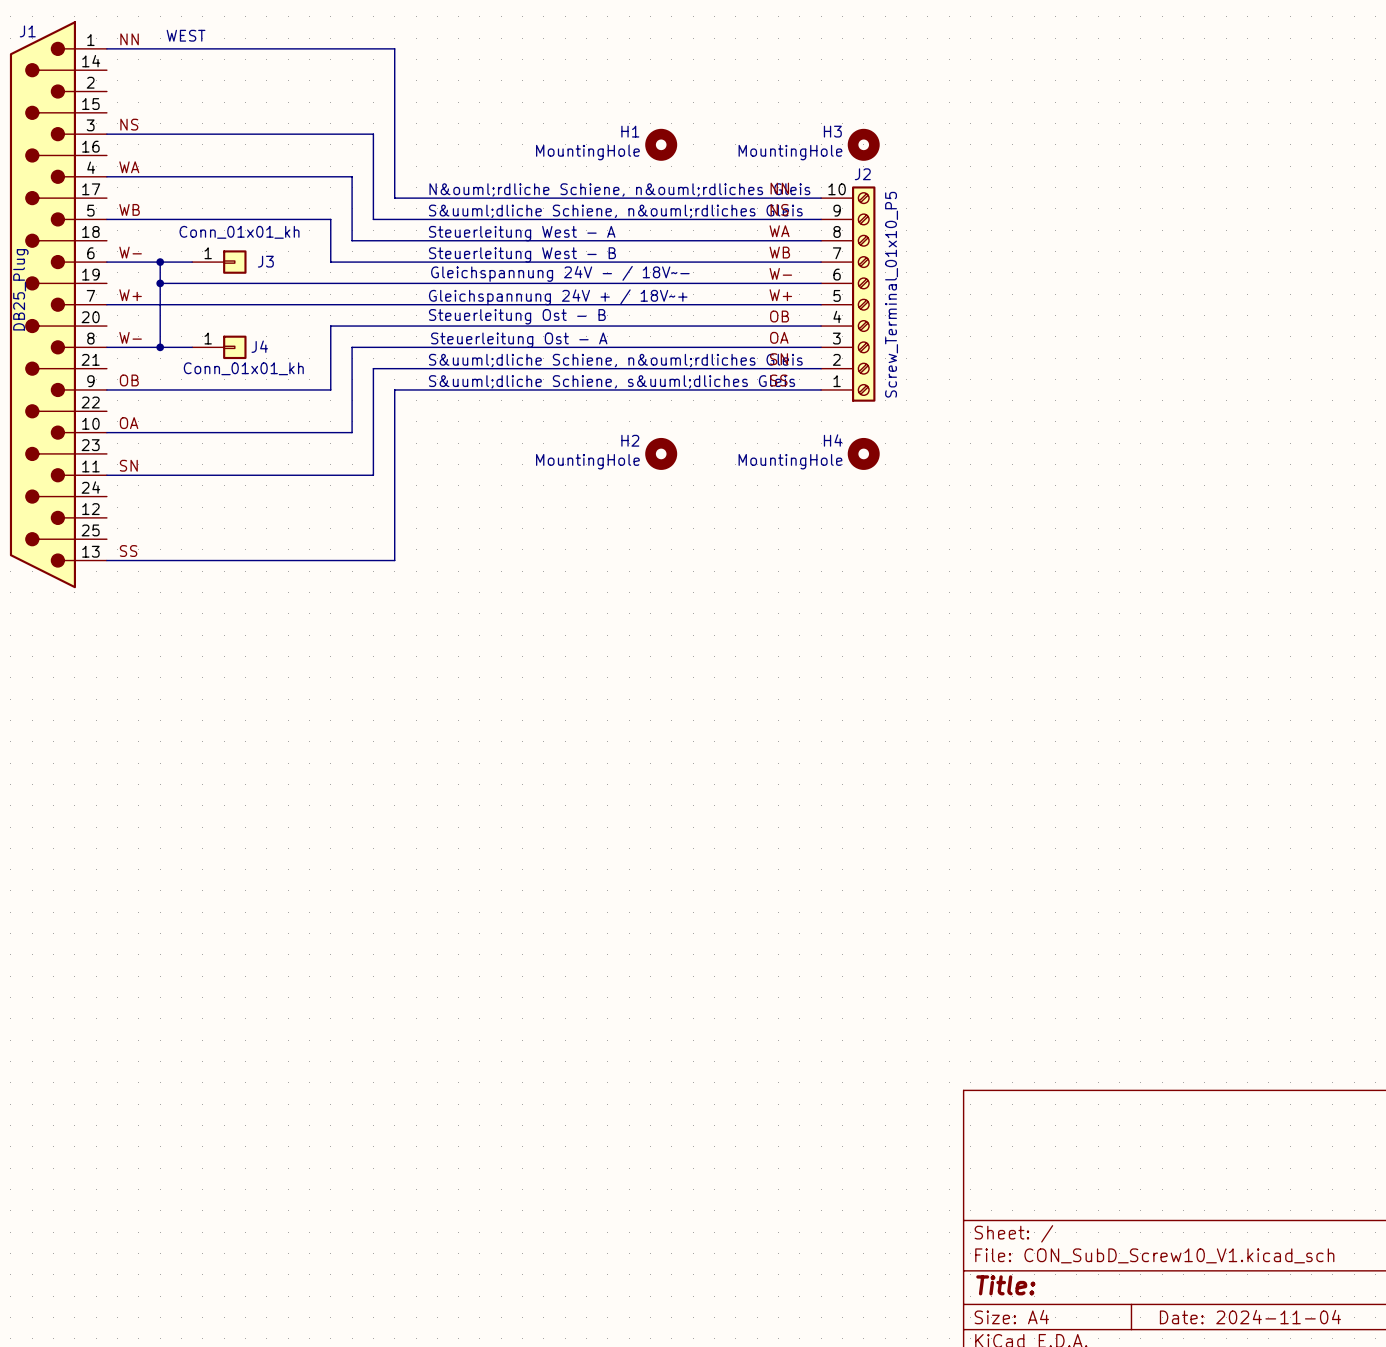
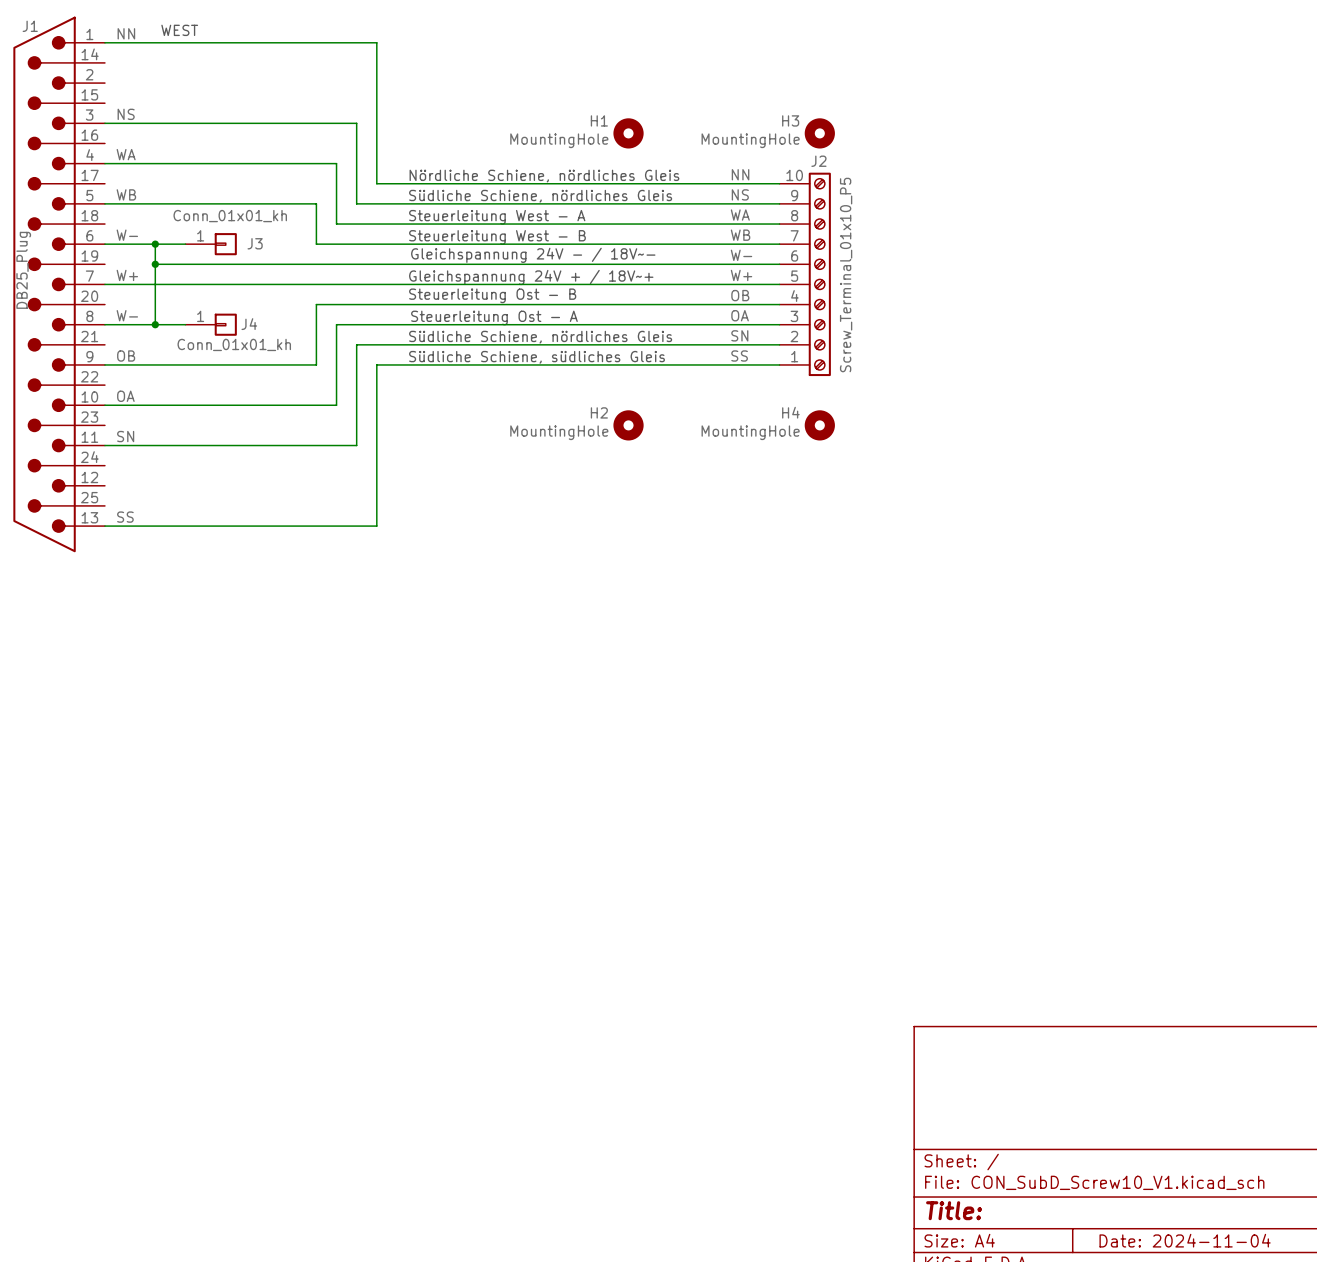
text: N&ouml;rdliche Schiene, n&ouml;rdliches Gleis (619, 189) -> Nördliche Schiene, nördliches Gleis (544, 176)
text: S&uuml;dliche Schiene, n&ouml;rdliches Gleis (615, 211) -> Südliche Schiene, nördliches Gleis (540, 196)
text: S&uuml;dliche Schiene, n&ouml;rdliches Gleis (615, 360) -> Südliche Schiene, nördliches Gleis (540, 337)
text: S&uuml;dliche Schiene, s&uuml;dliches Gleis (612, 381) -> Südliche Schiene, südliches Gleis (537, 357)

